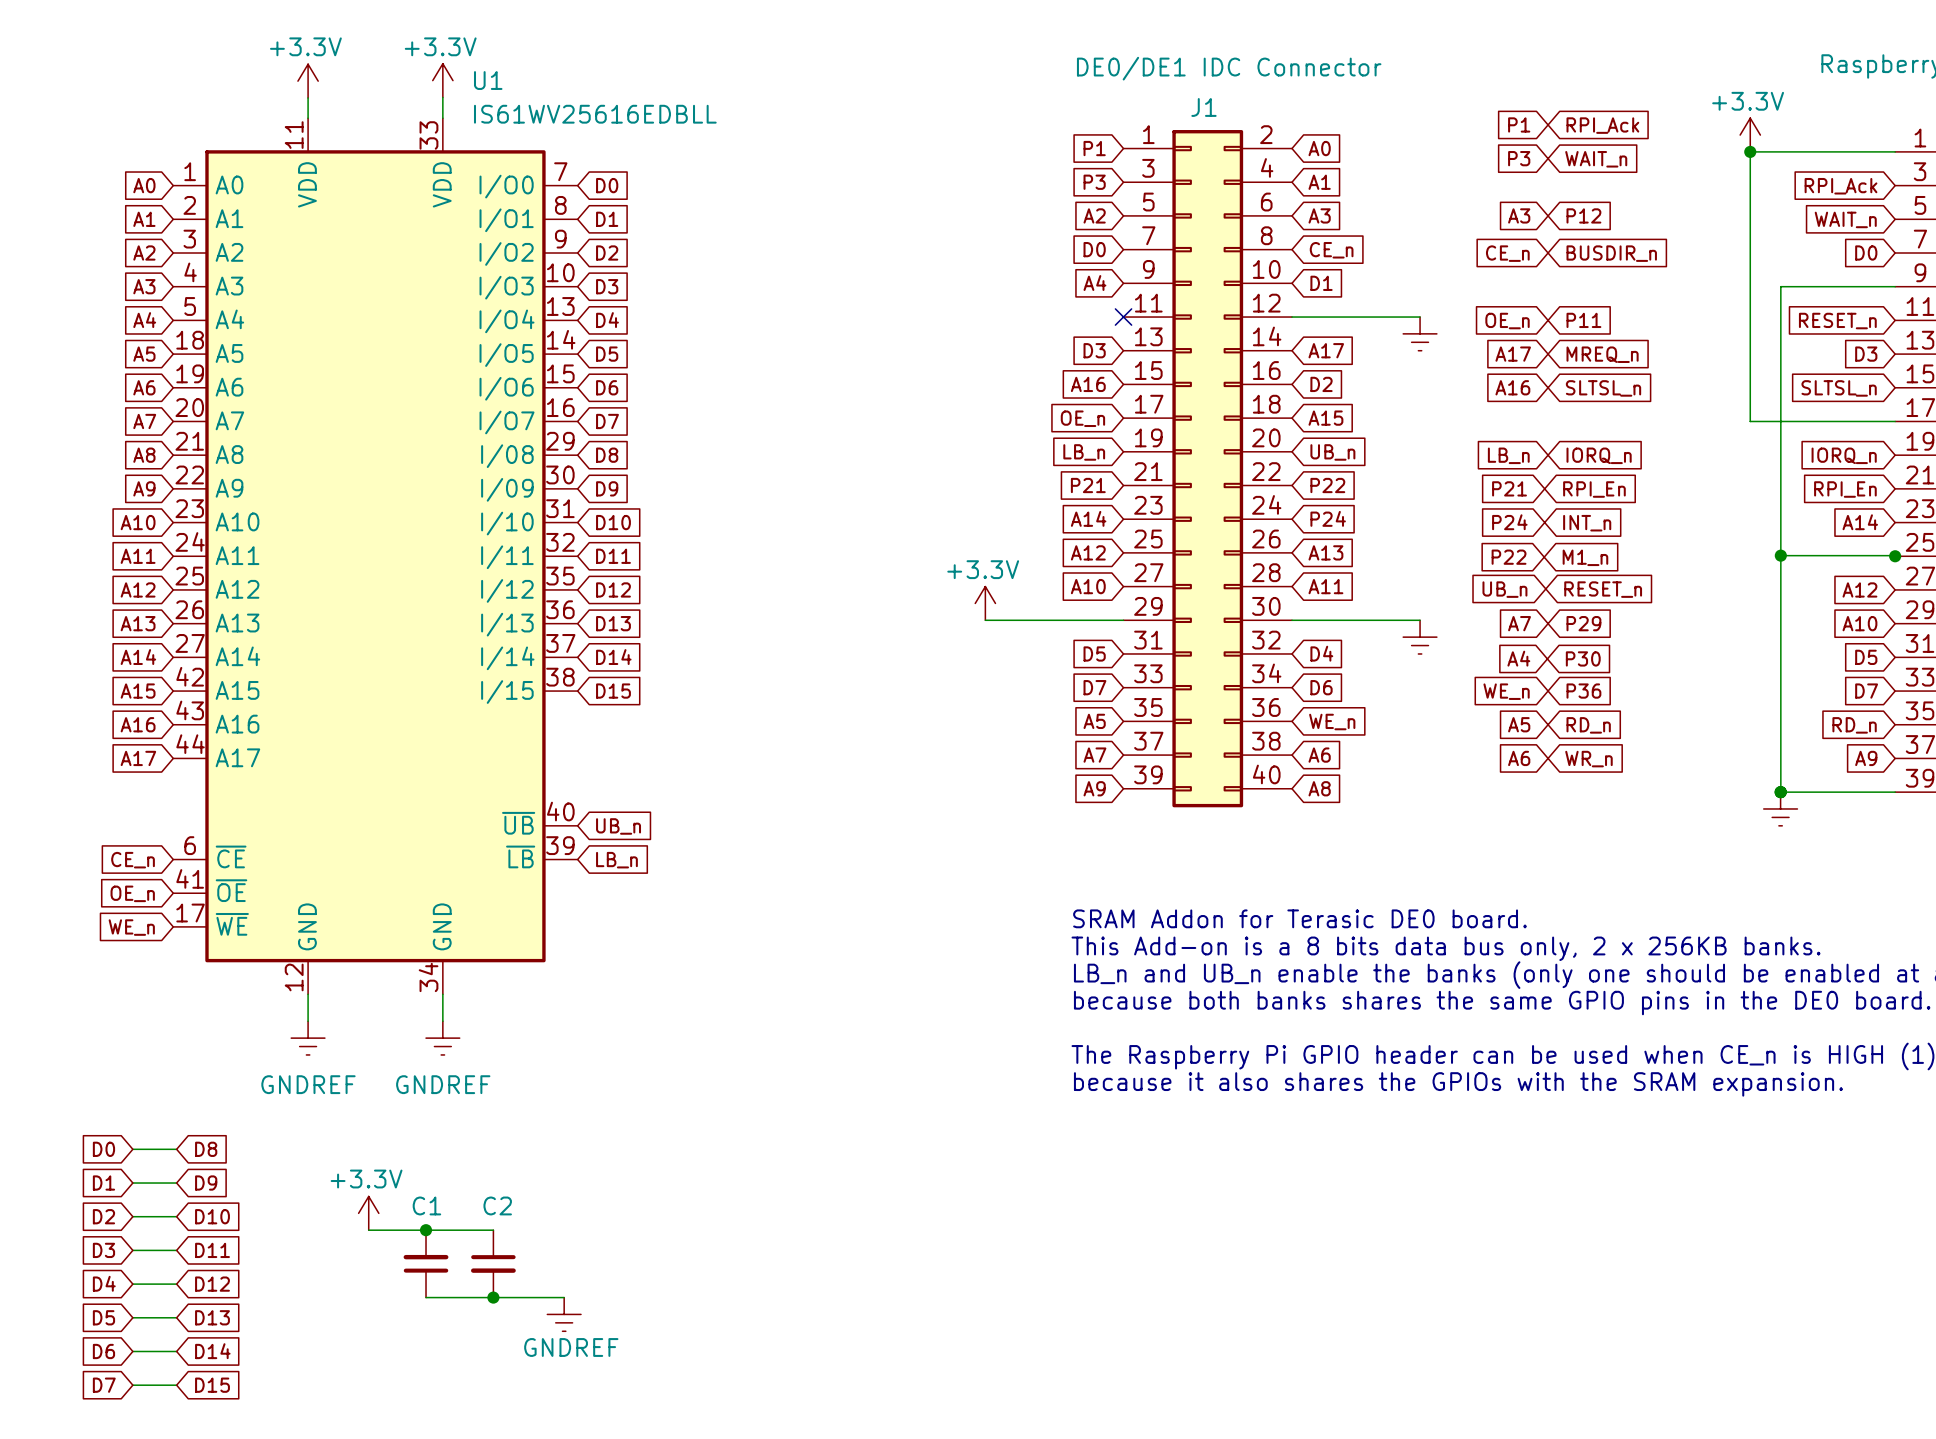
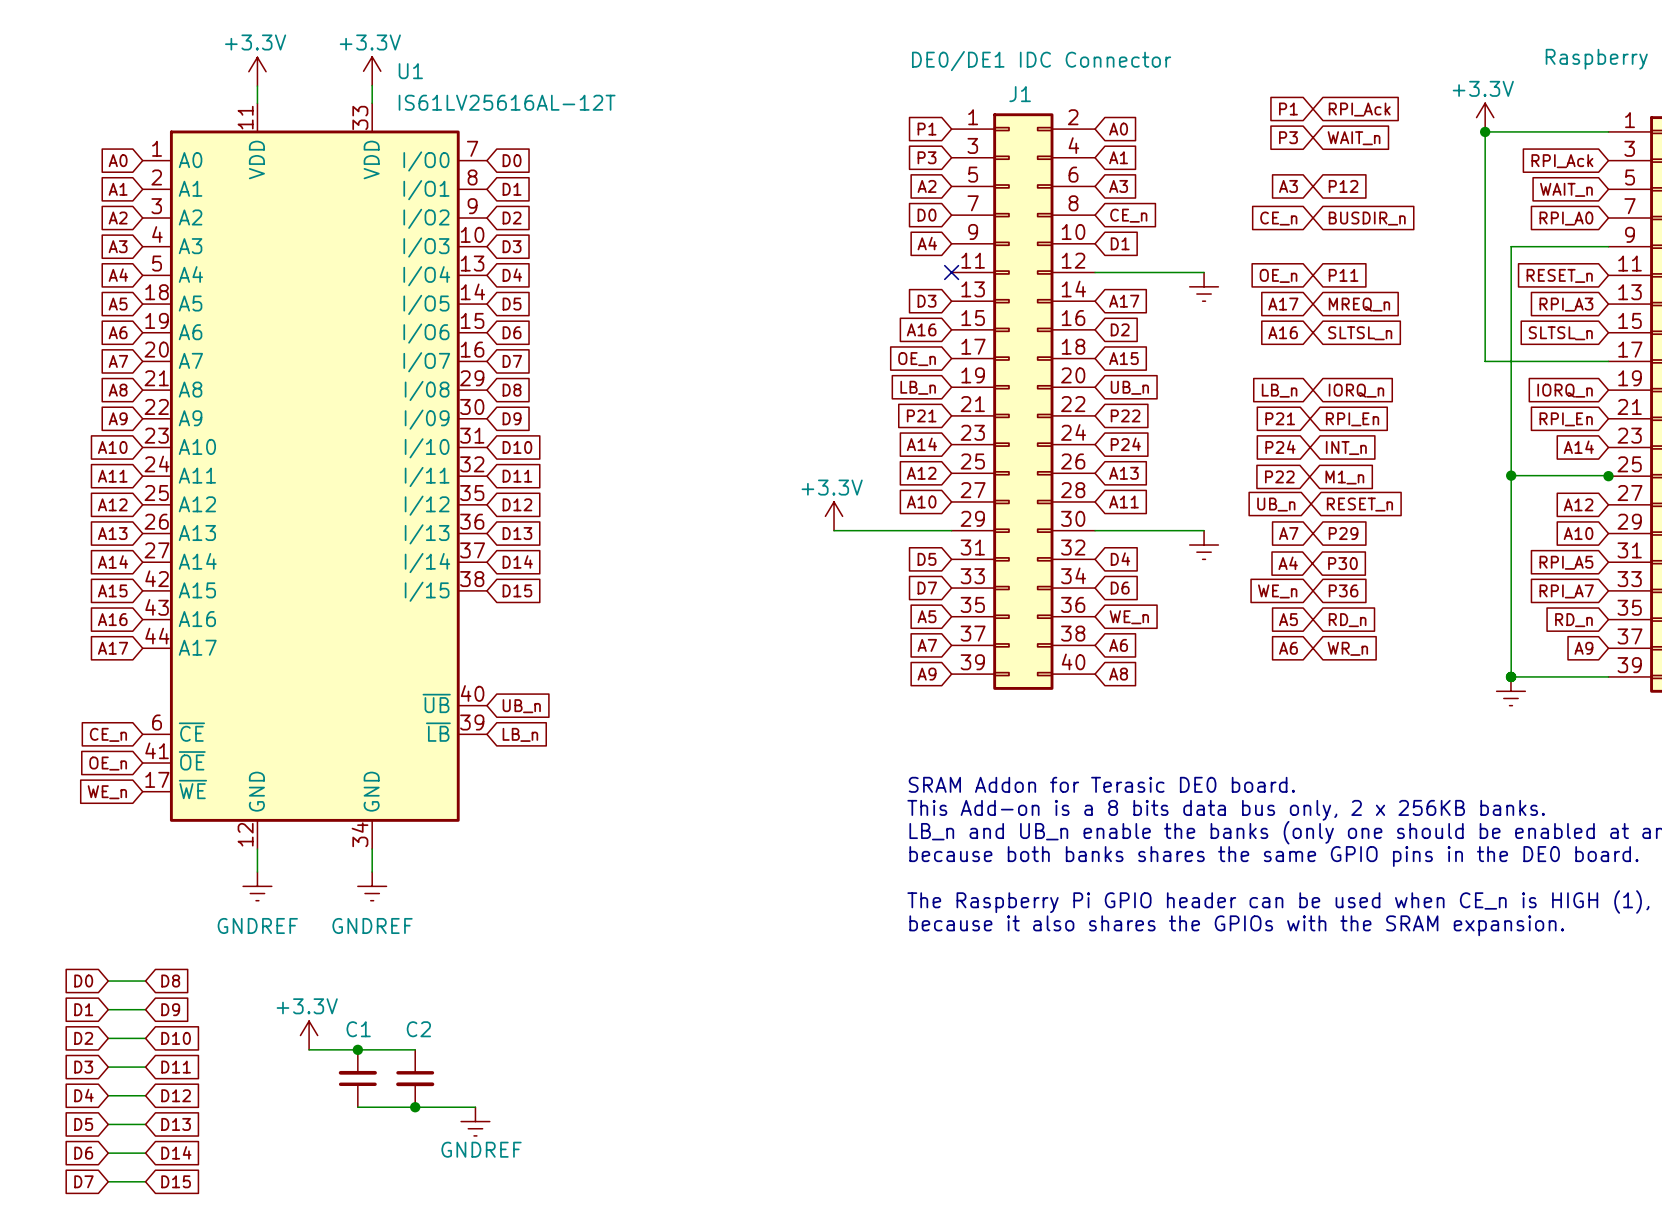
U1 value: IS61WV25616EDBLL (595, 114) -> IS61LV25616AL-12T (507, 102)
global label: D0 (1866, 253) -> RPI_A0 (1566, 218)
global label: D3 (1866, 354) -> RPI_A3 (1566, 304)
global label: D5 (1866, 657) -> RPI_A5 (1566, 562)
global label: D7 (1866, 691) -> RPI_A7 (1566, 591)

